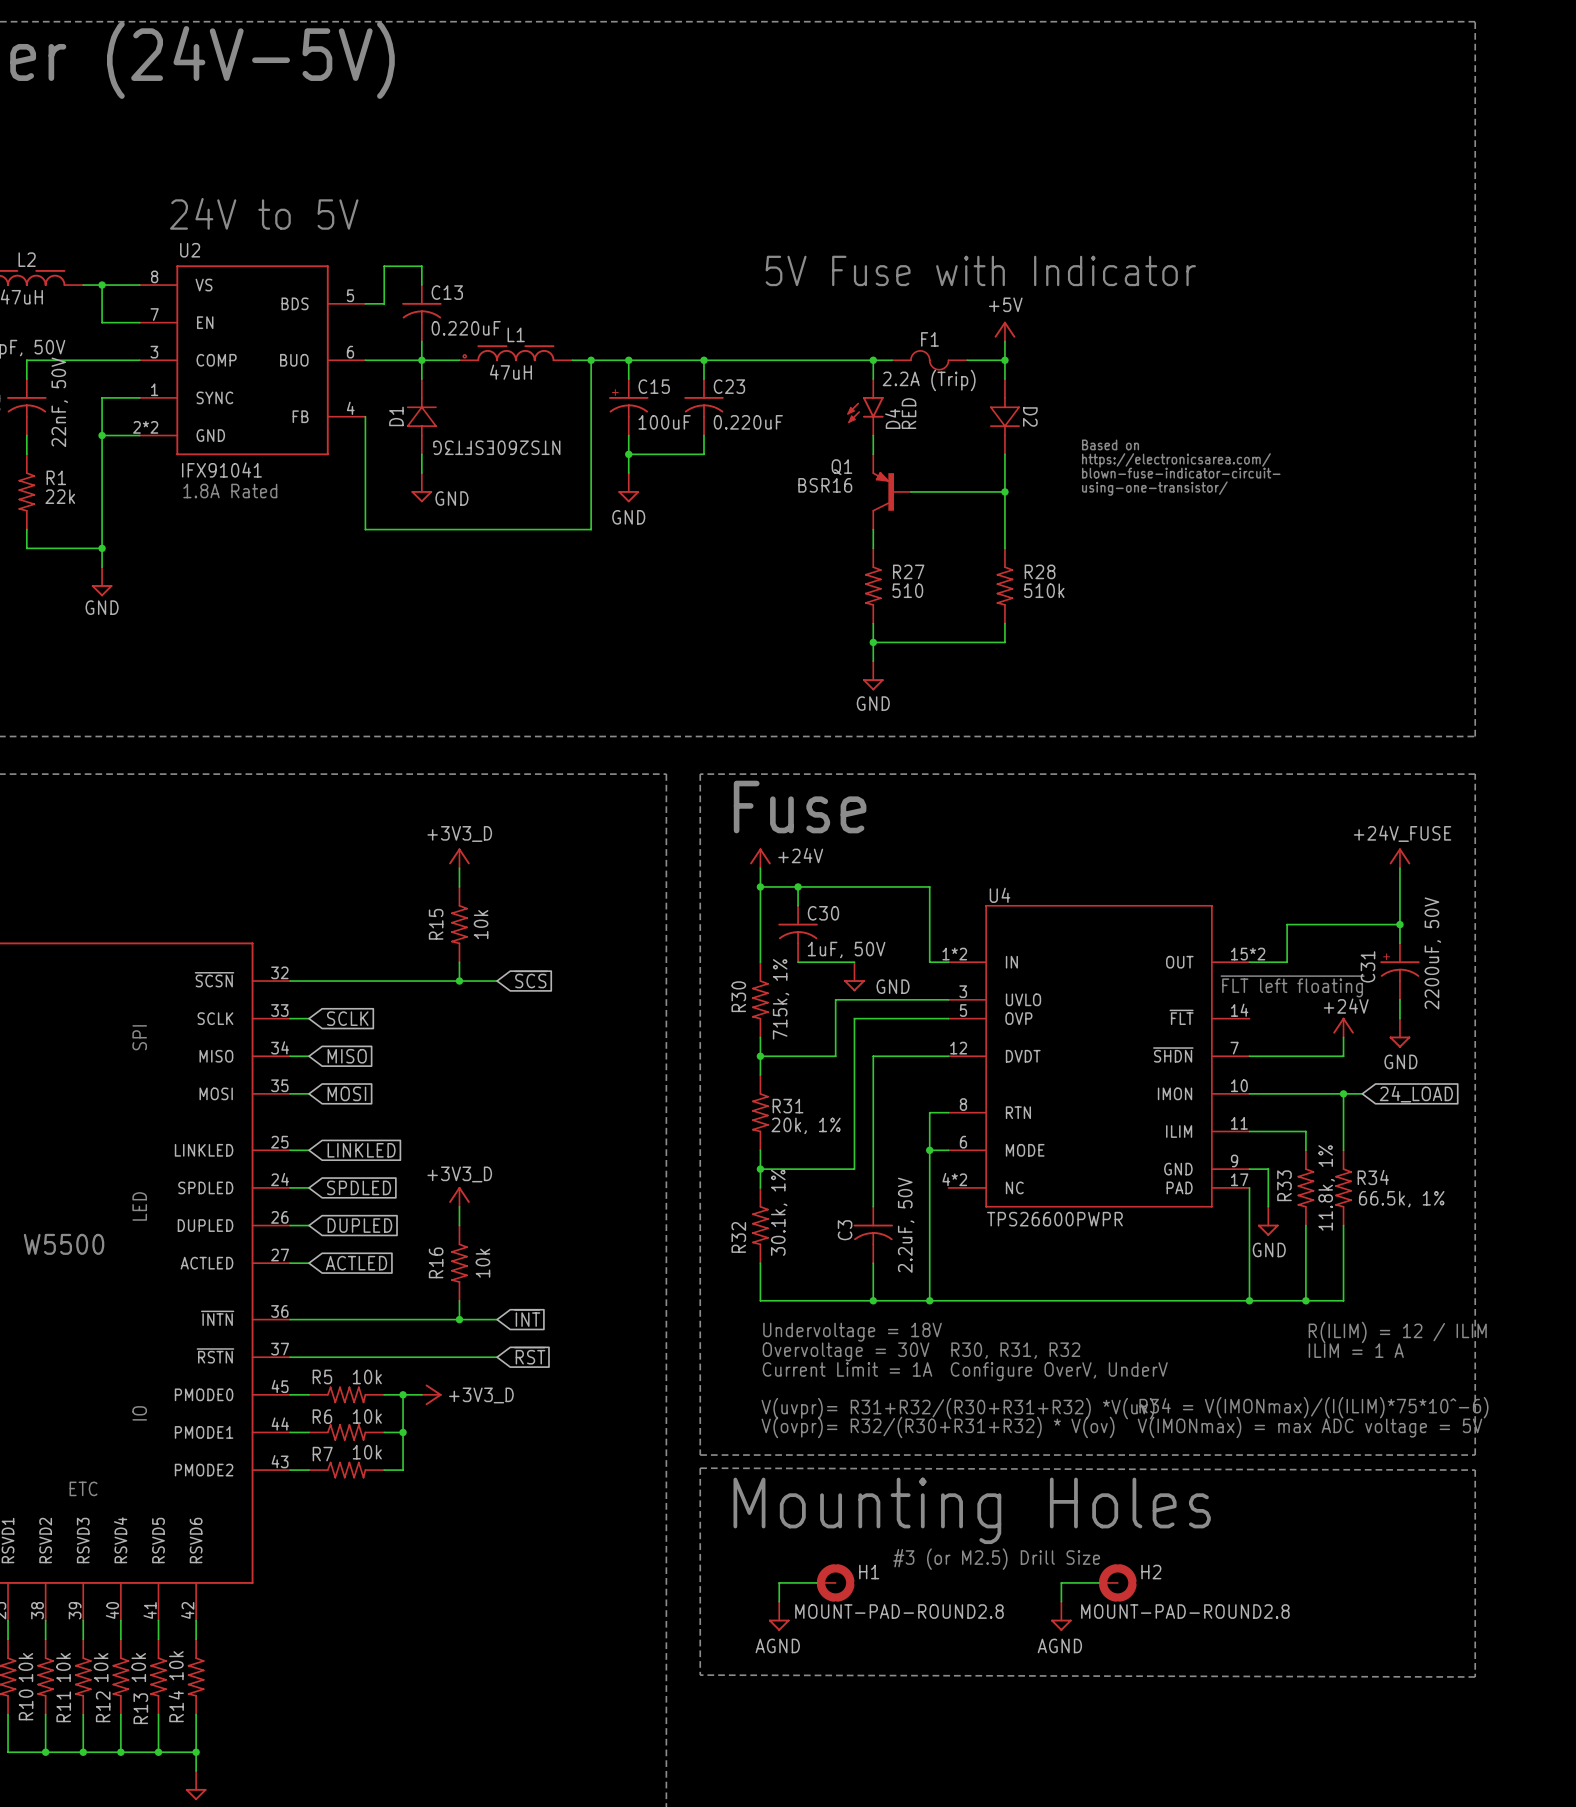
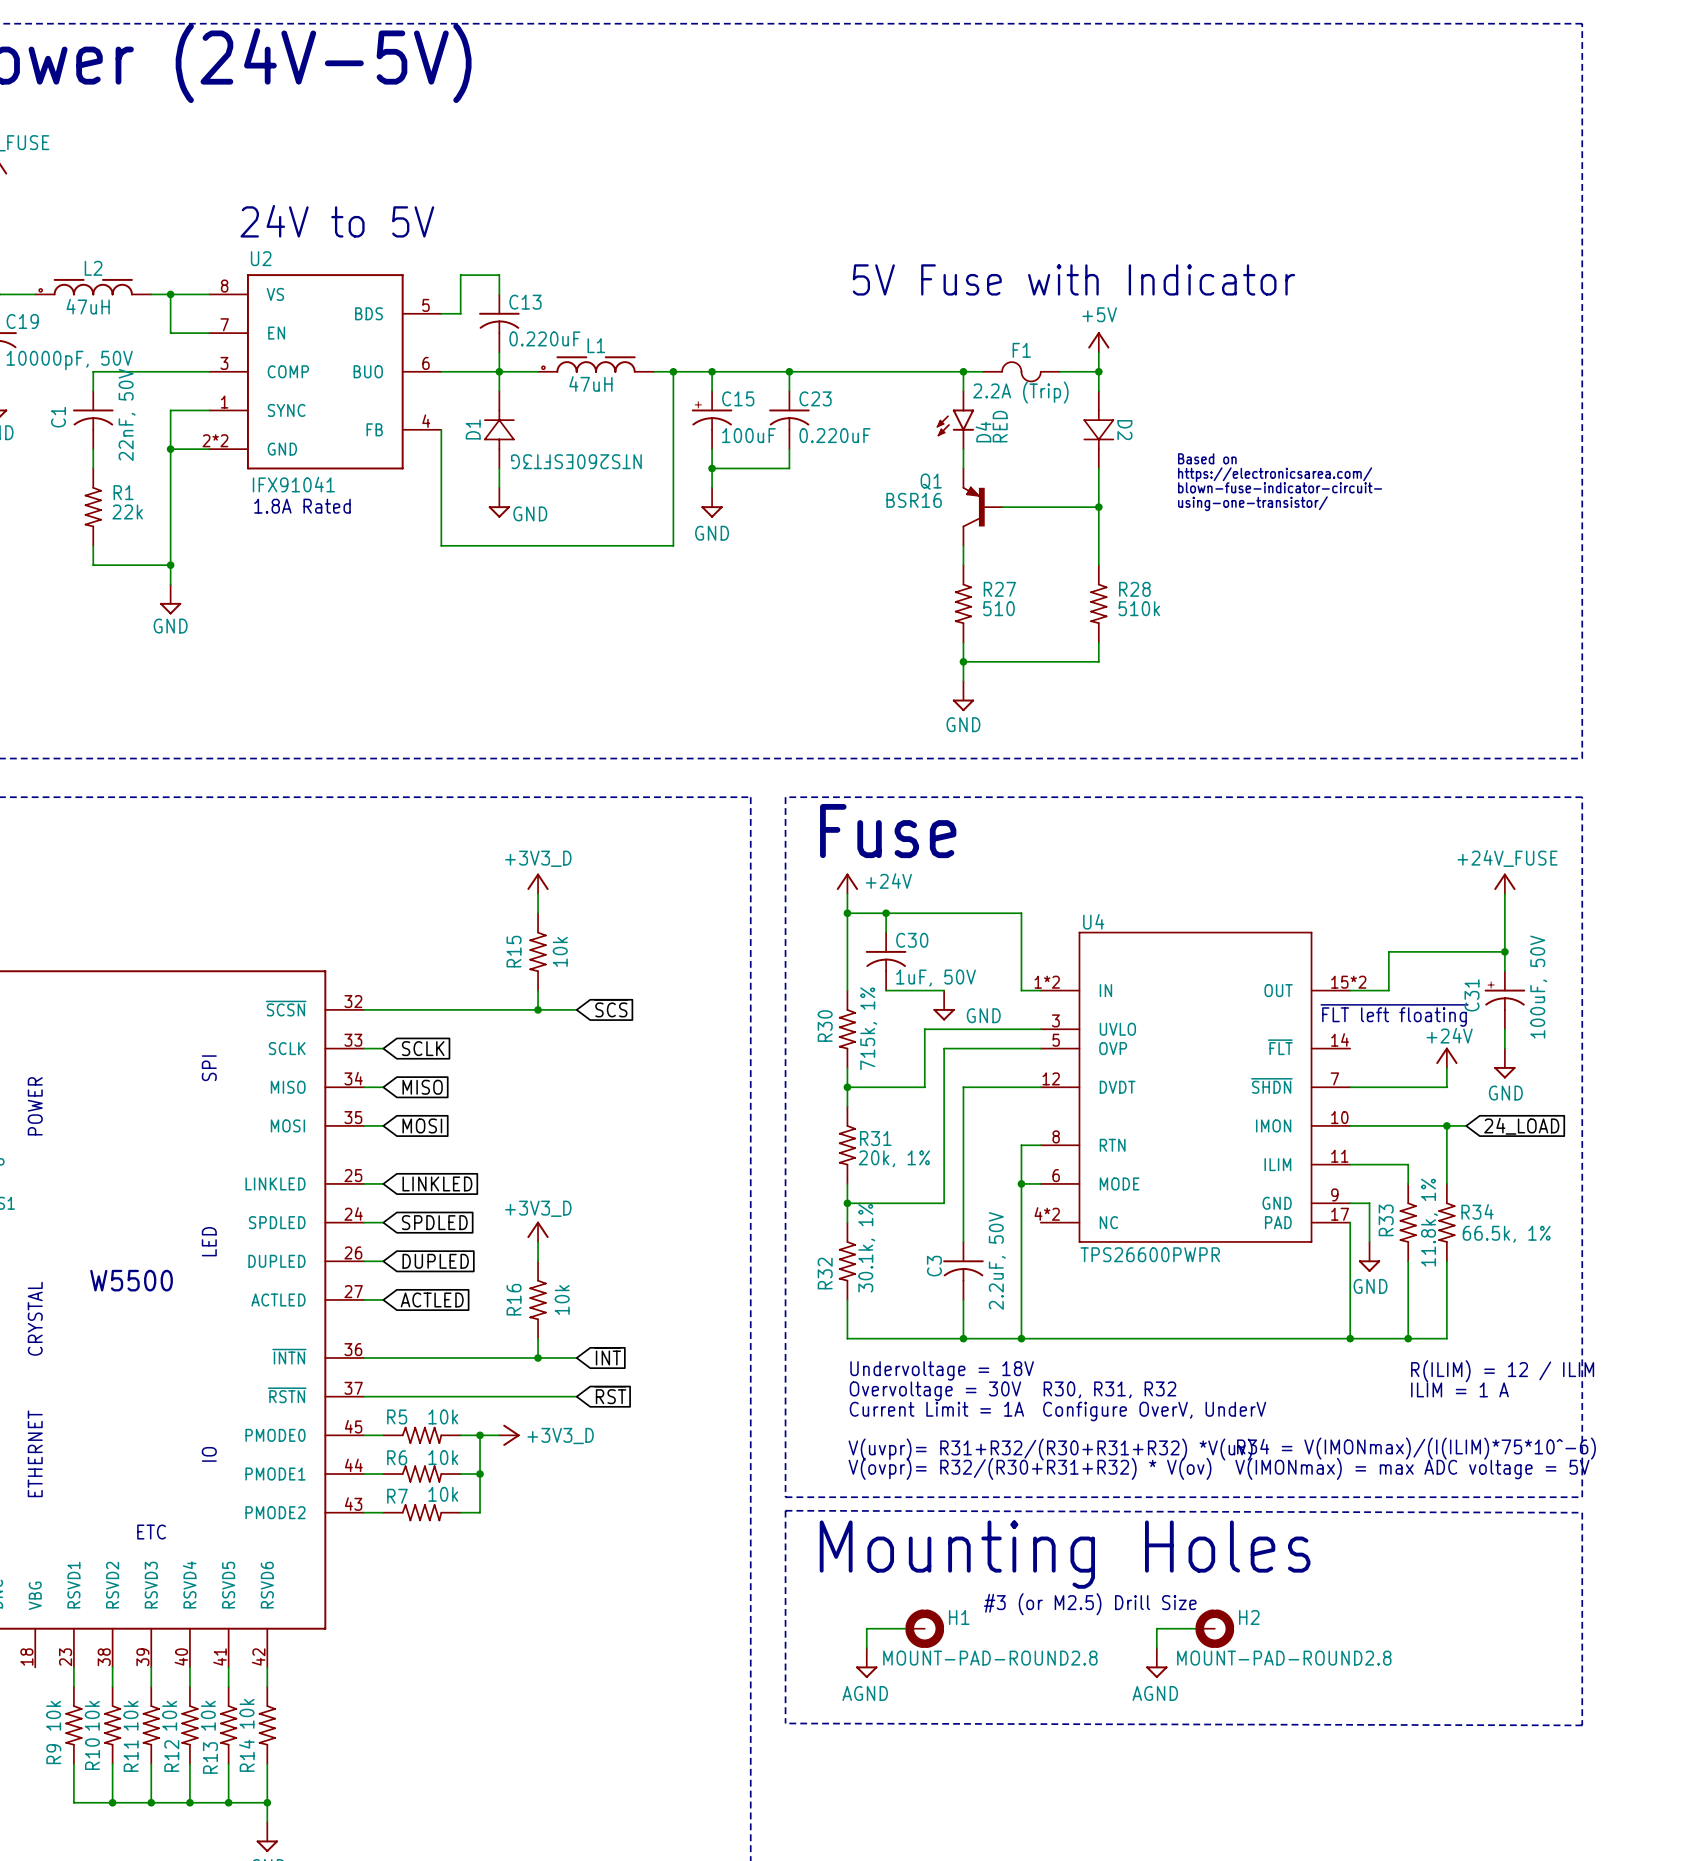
C31 value: 2200uF, 50V (1432, 953) -> 100uF, 50V (1538, 987)

